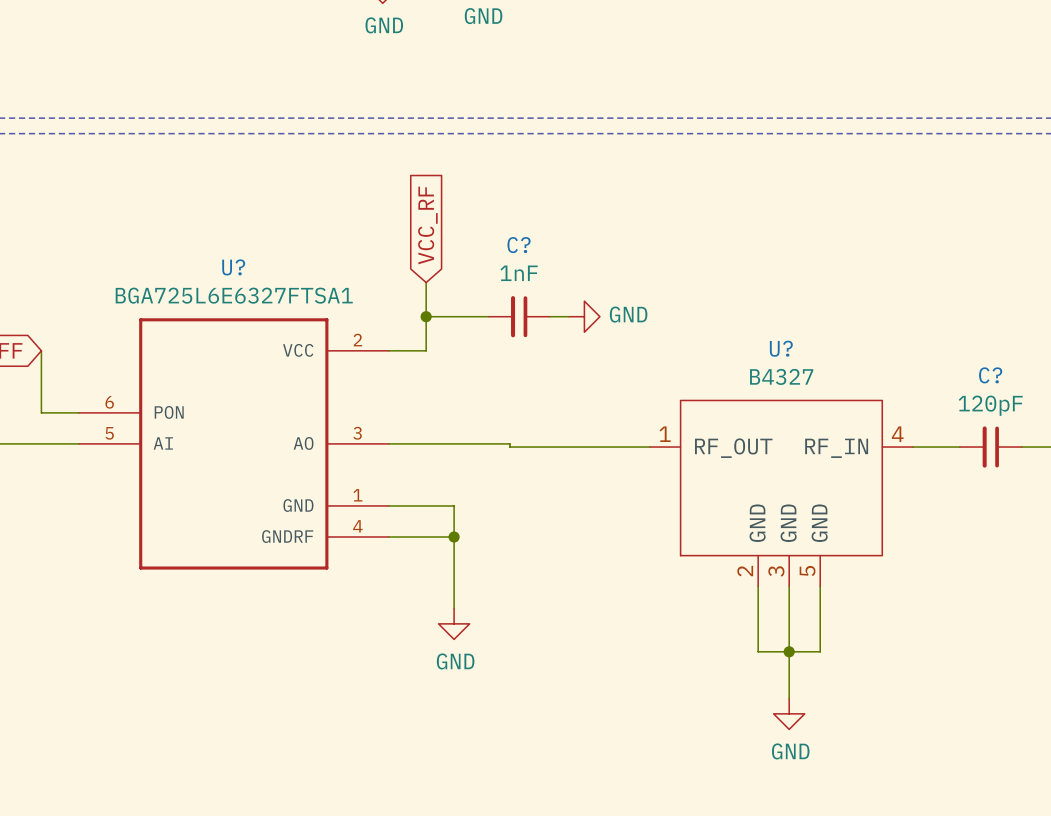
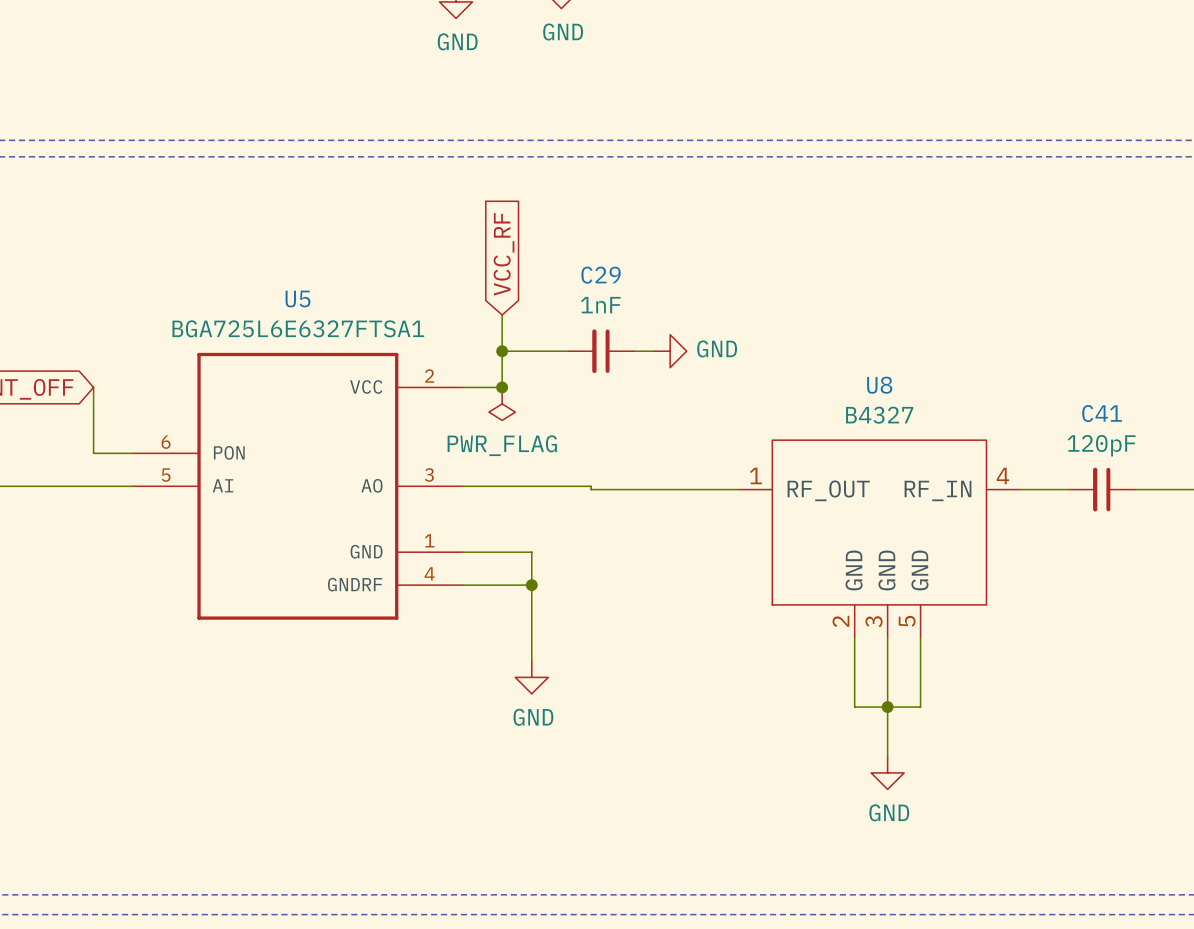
C? name: C? (519, 245) -> C29 (601, 275)
U? name: U? (233, 267) -> U5 (298, 299)
U? name: U? (781, 348) -> U8 (879, 385)
junction: none -> (502, 387)
power symbol: none -> PWR_FLAG (502, 403)
C? name: C? (990, 375) -> C41 (1102, 413)

